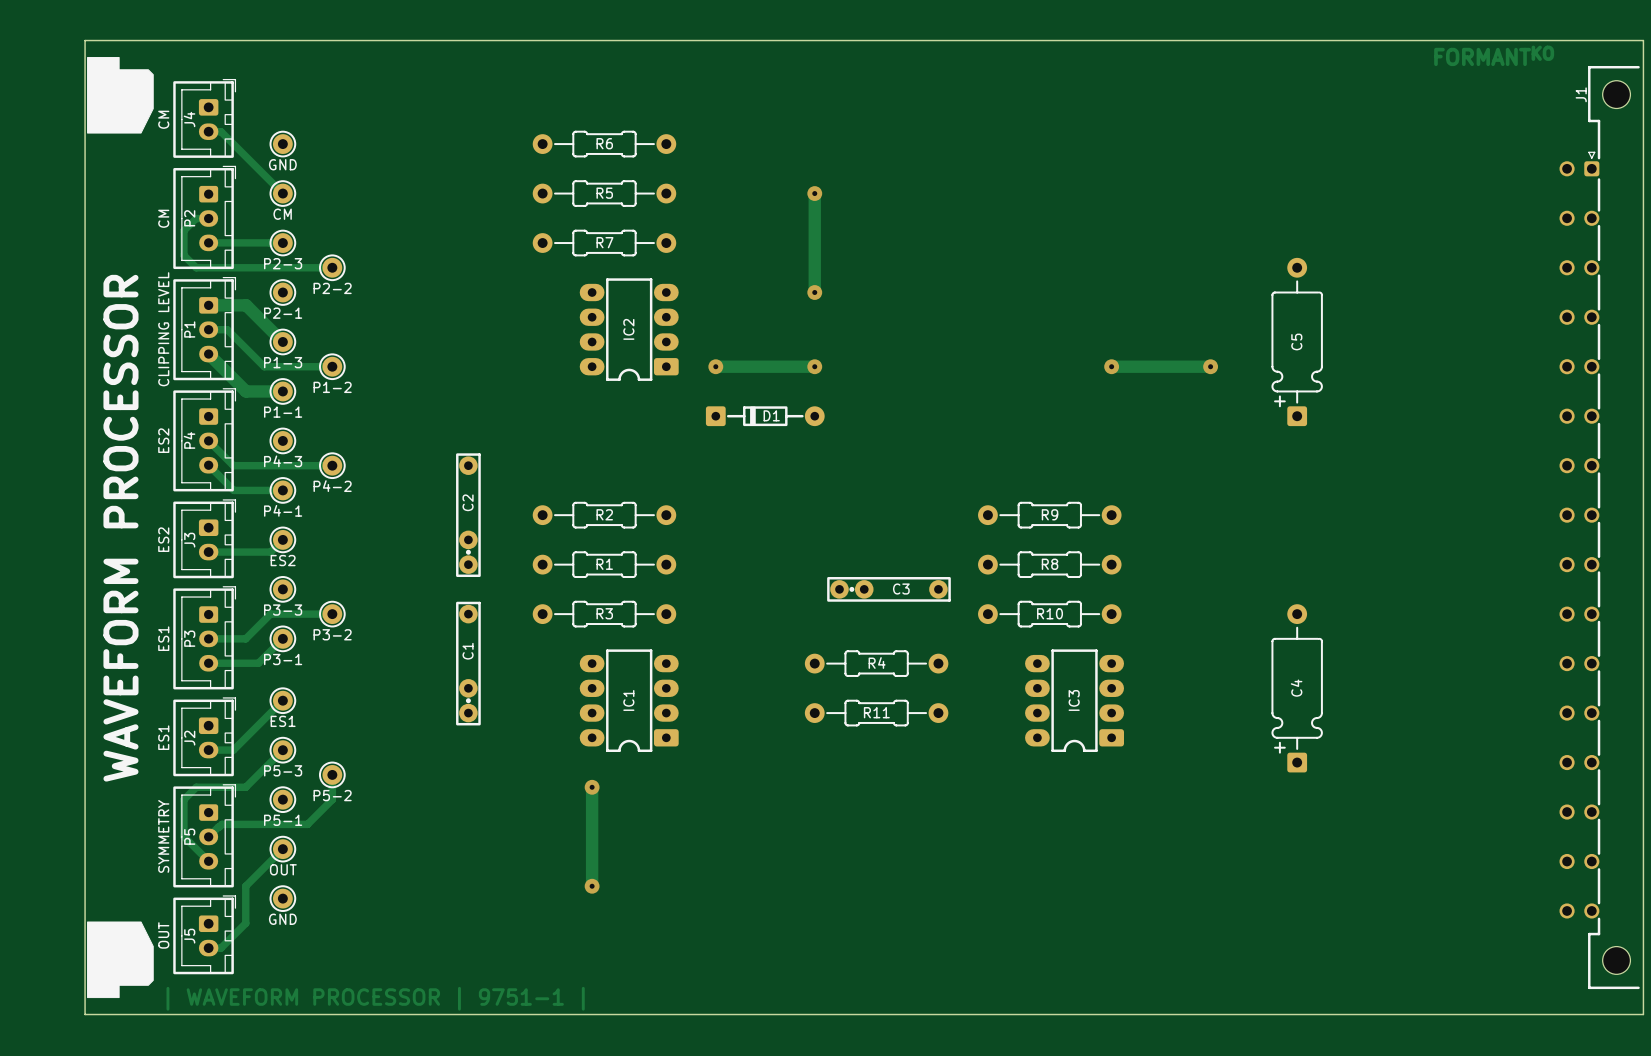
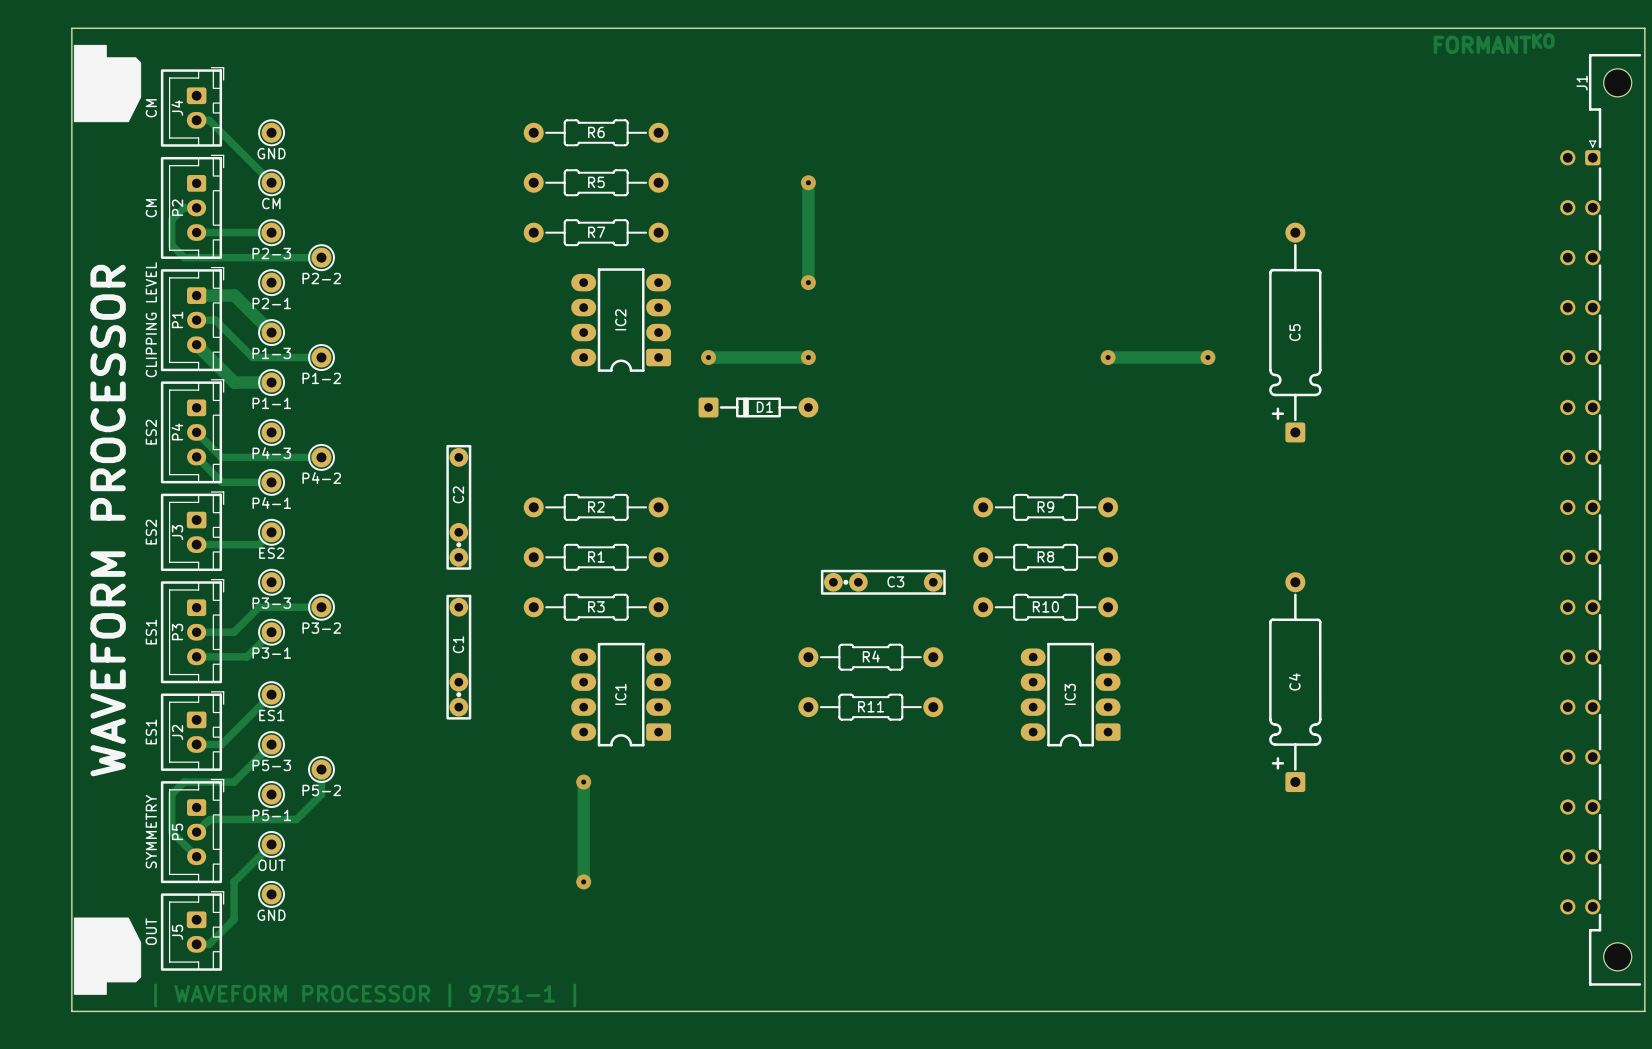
C5 footprint: [1271, 257, 1323, 427] -> [1269, 222, 1322, 443]
C4 footprint: [1271, 604, 1323, 773] -> [1269, 572, 1322, 793]

